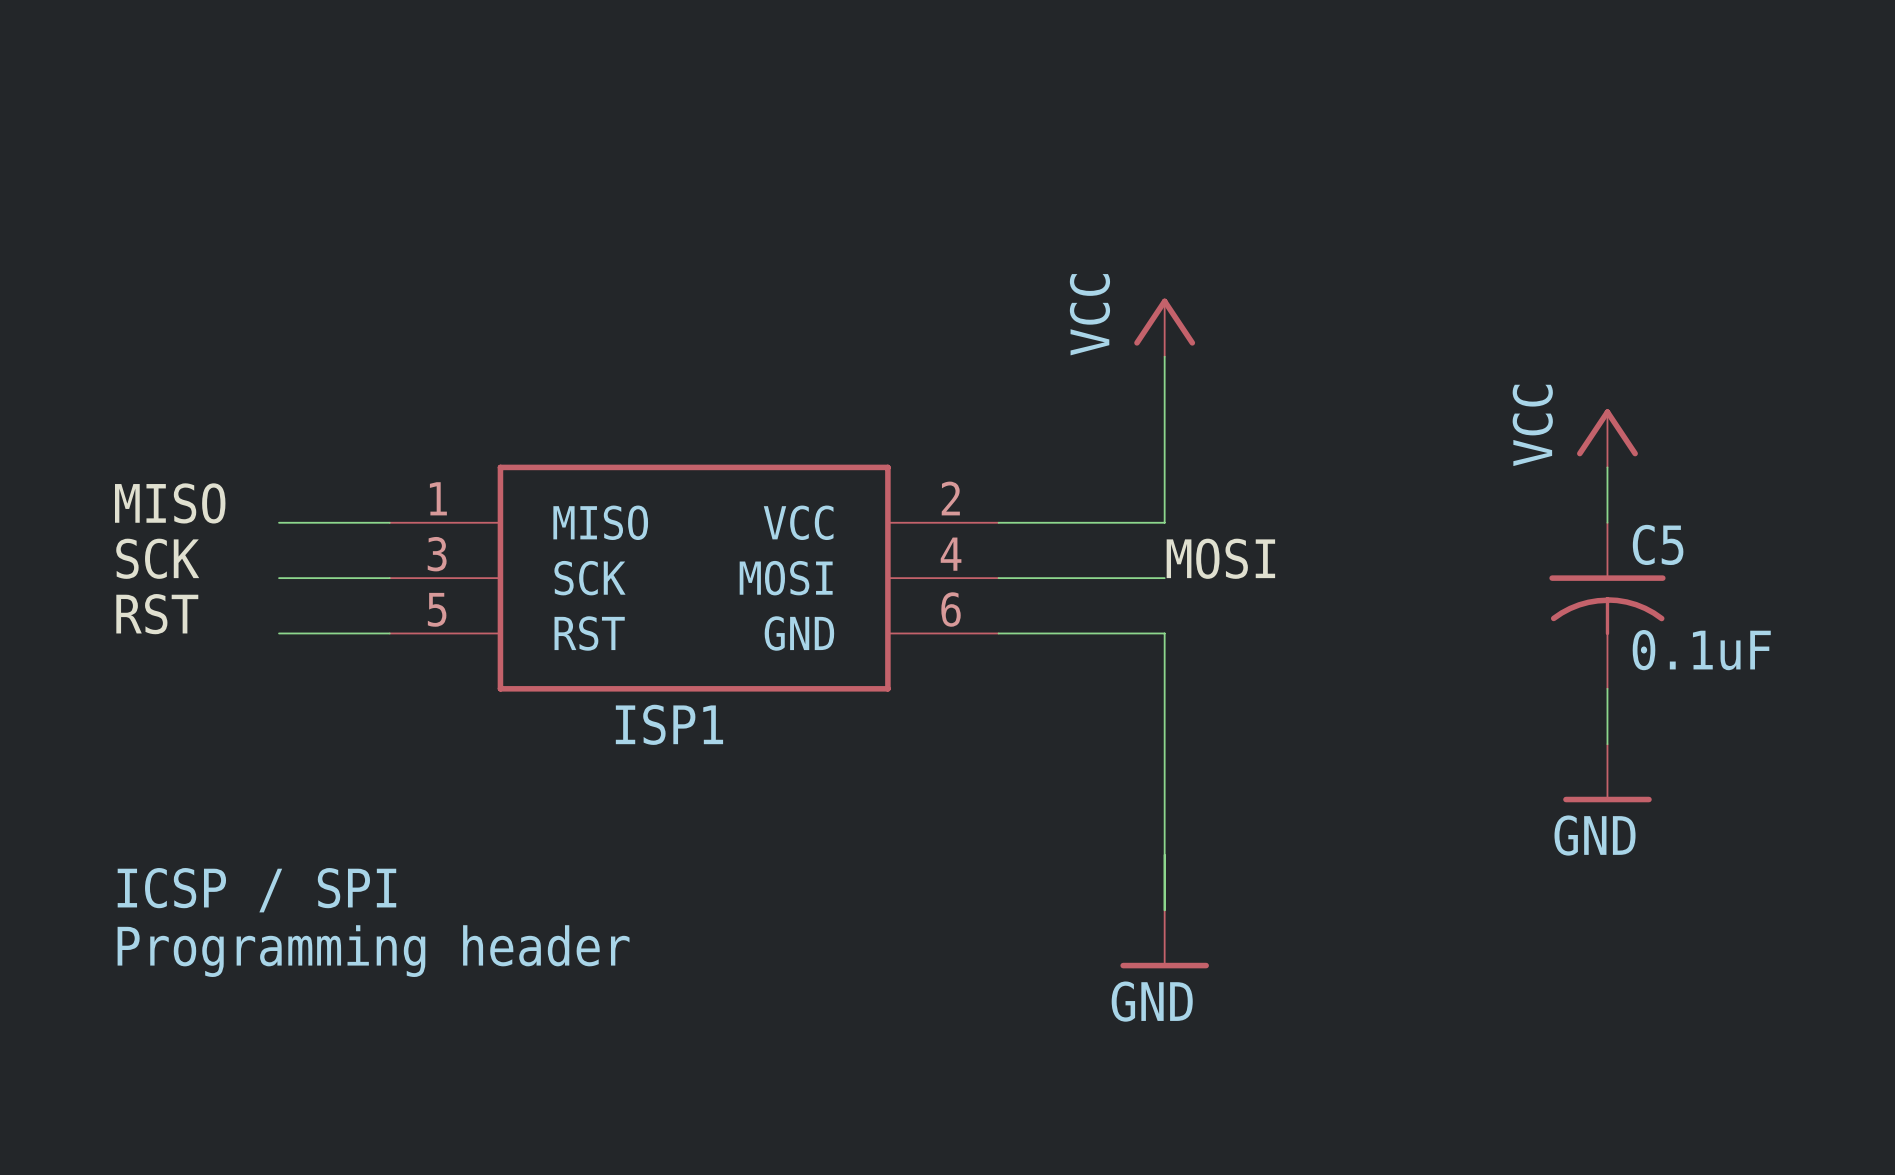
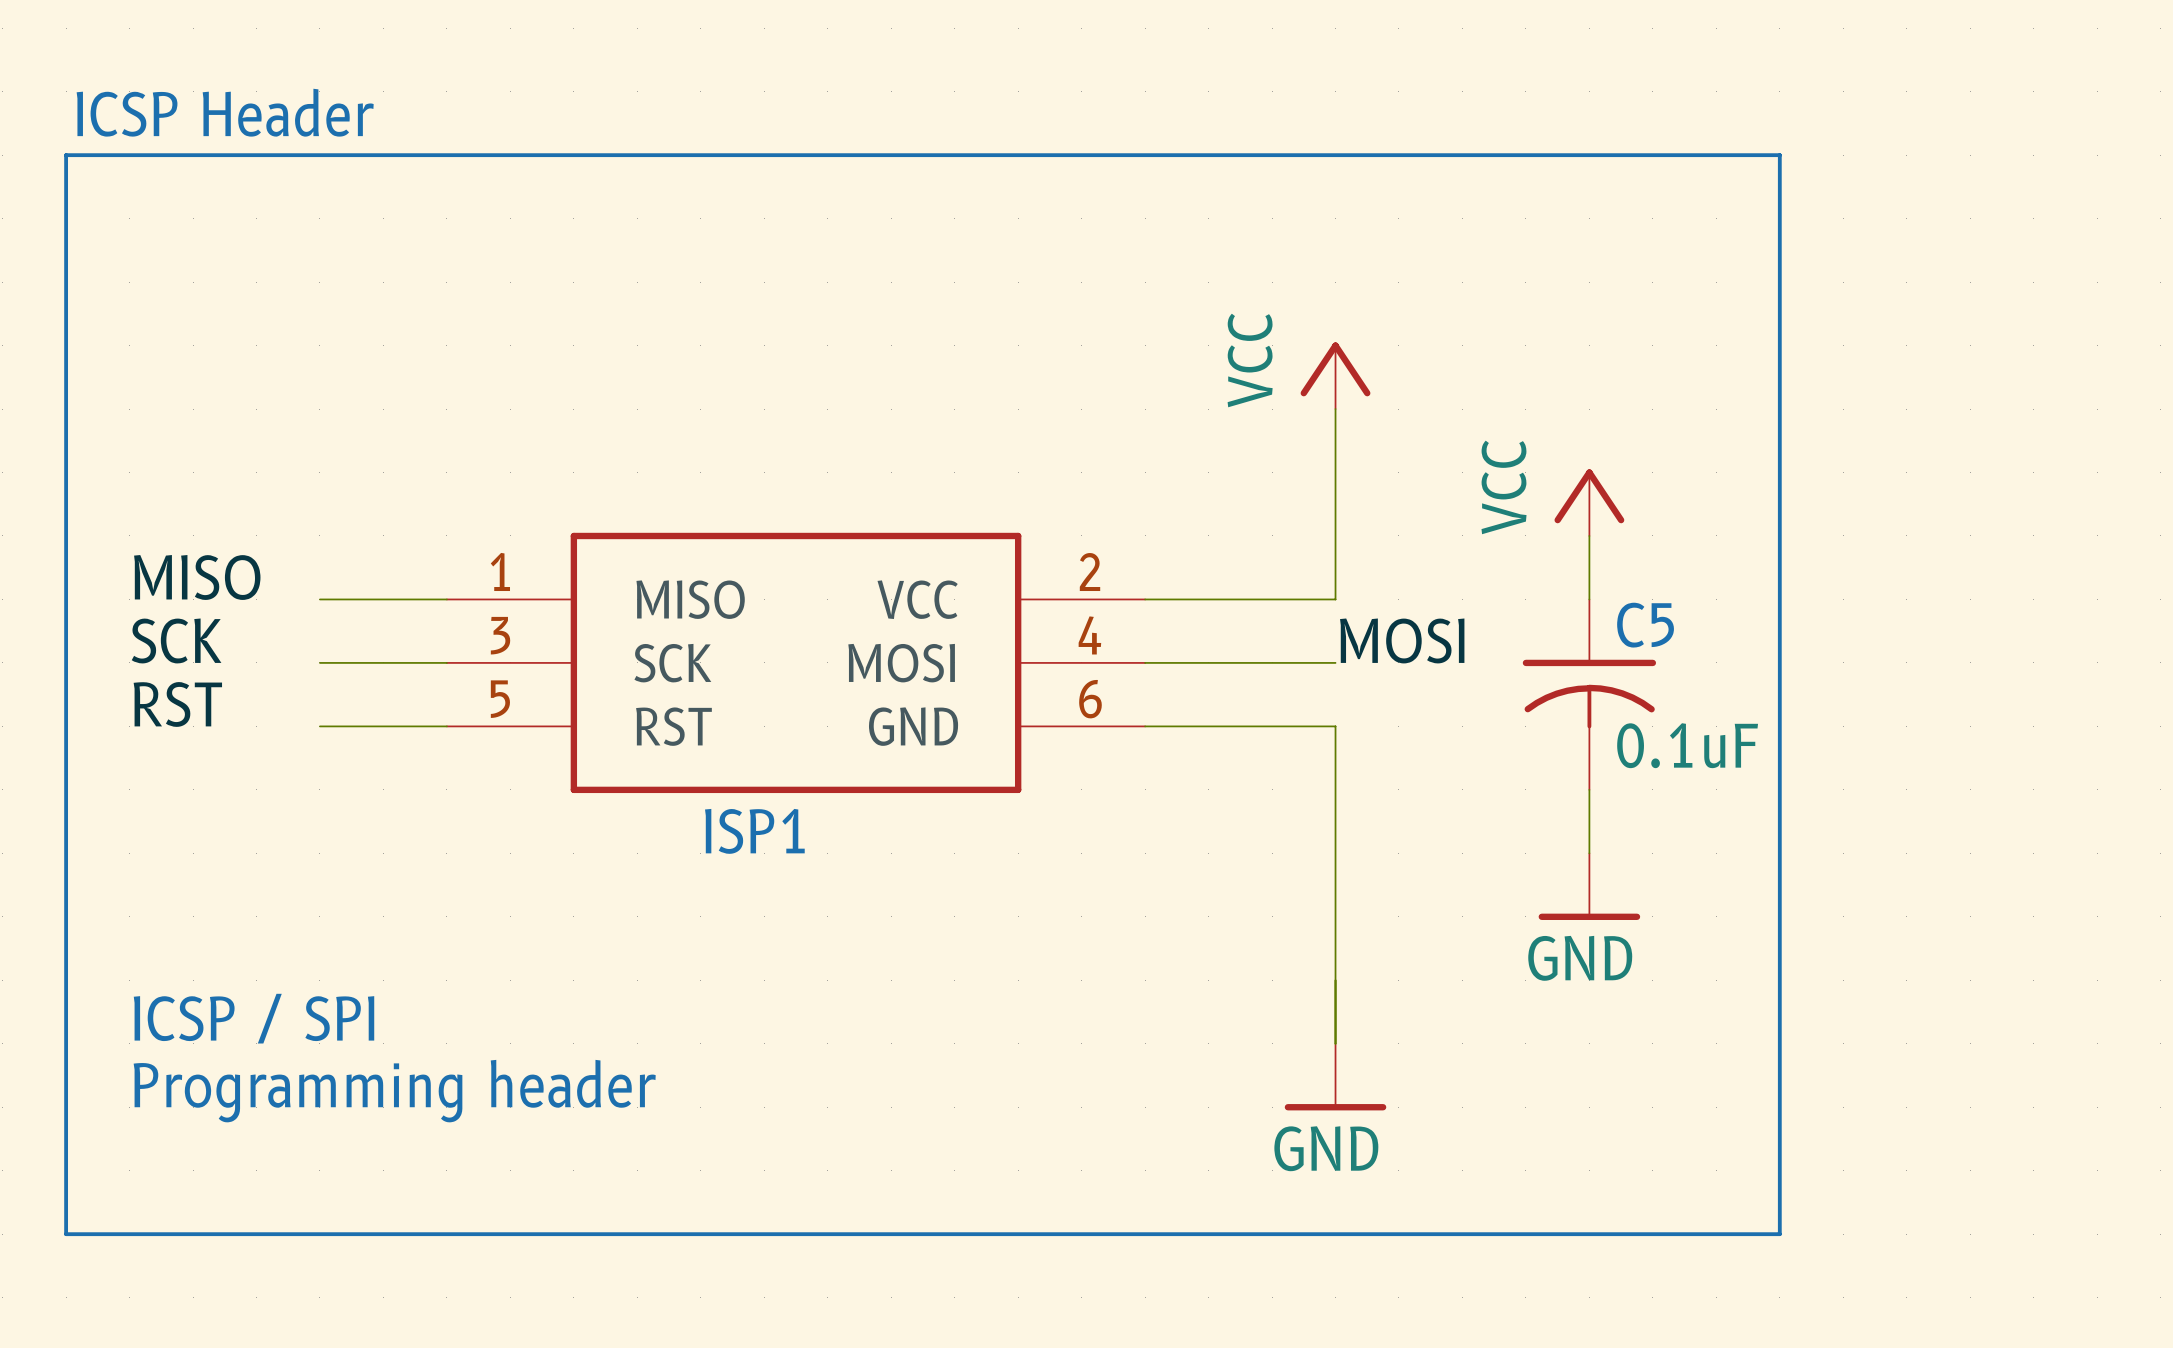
text: none -> ICSP Header (225, 112)
line: none -> (66, 155) (66, 1234) (1779, 1234) (1779, 155) (66, 155)
power symbol position: VCC (1607, 438) -> VCC (1589, 502)
wire: (1607, 467) (1607, 522) -> (1589, 535) (1589, 599)
C5 position: (1607, 605) -> (1589, 694)
wire: (1607, 688) (1607, 744) -> (1589, 789) (1589, 853)
power symbol position: GND (1607, 773) -> GND (1589, 886)

